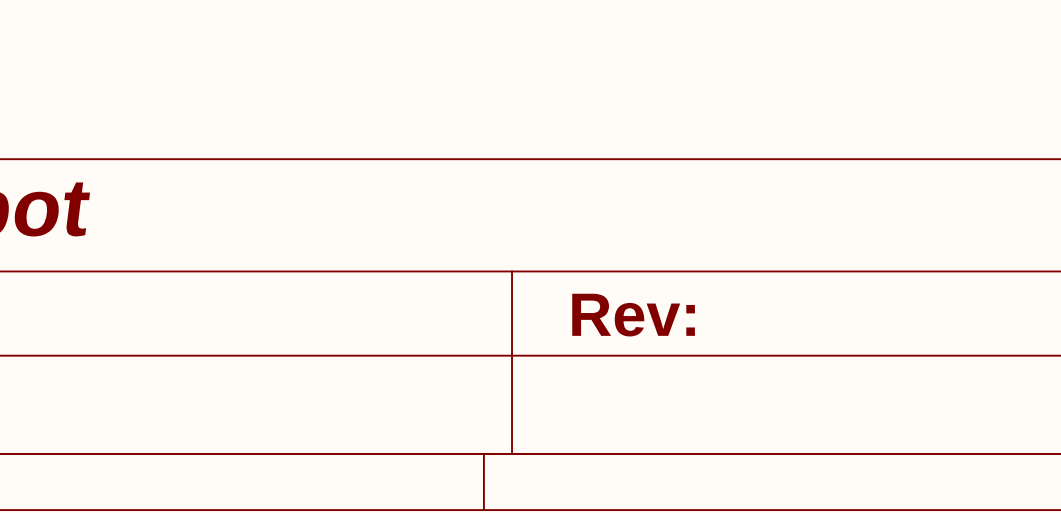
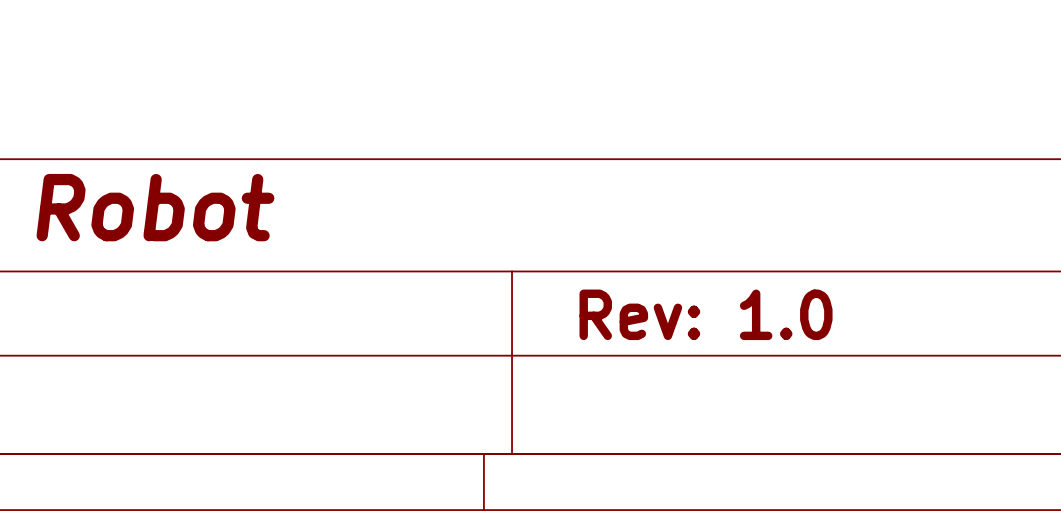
title block: Rev: (633, 315) -> Rev: 1.0 (706, 314)

